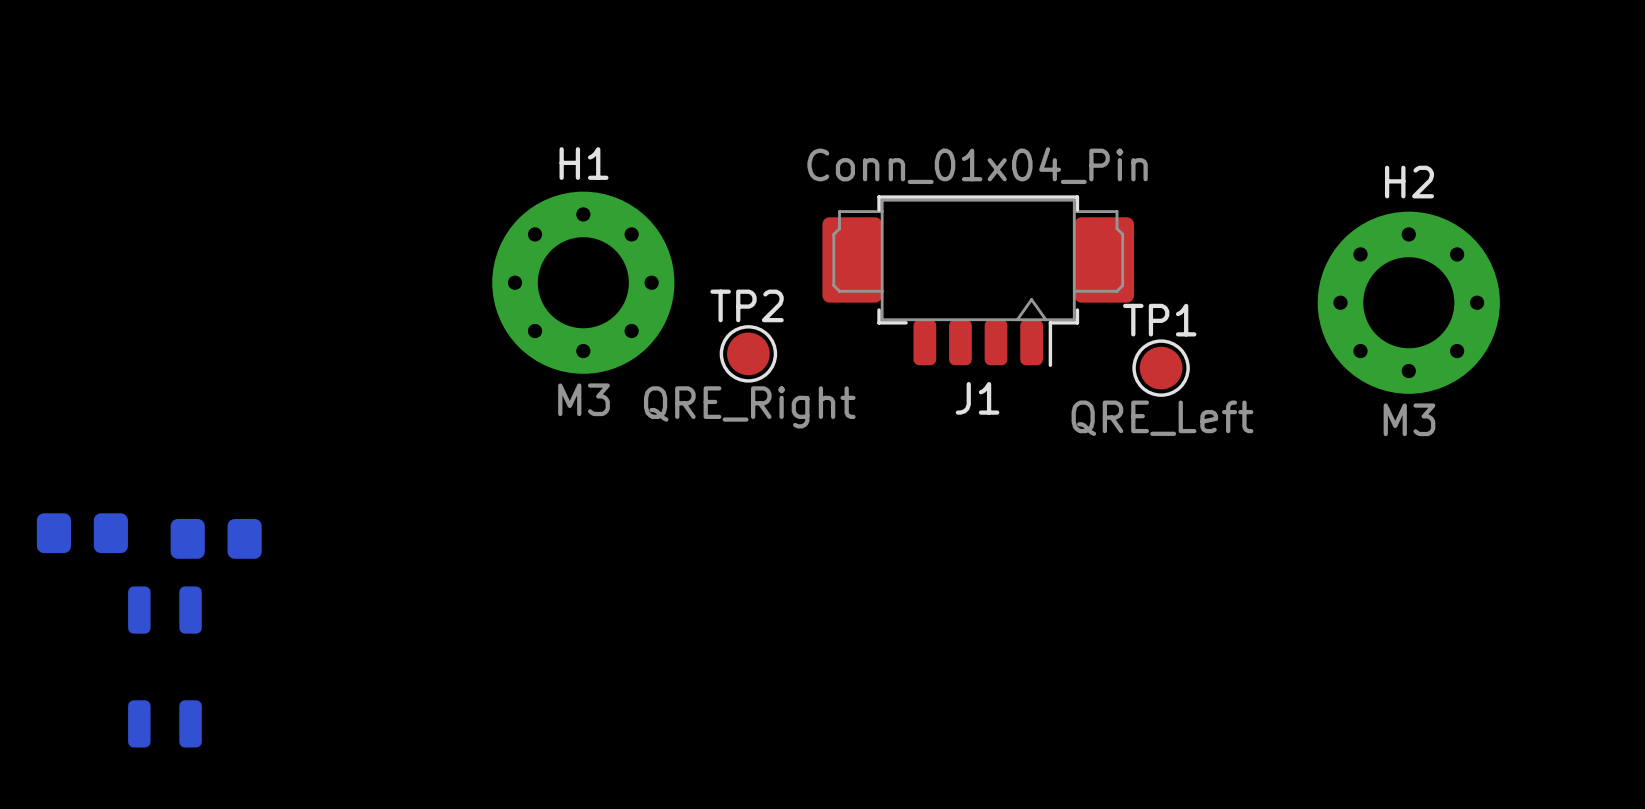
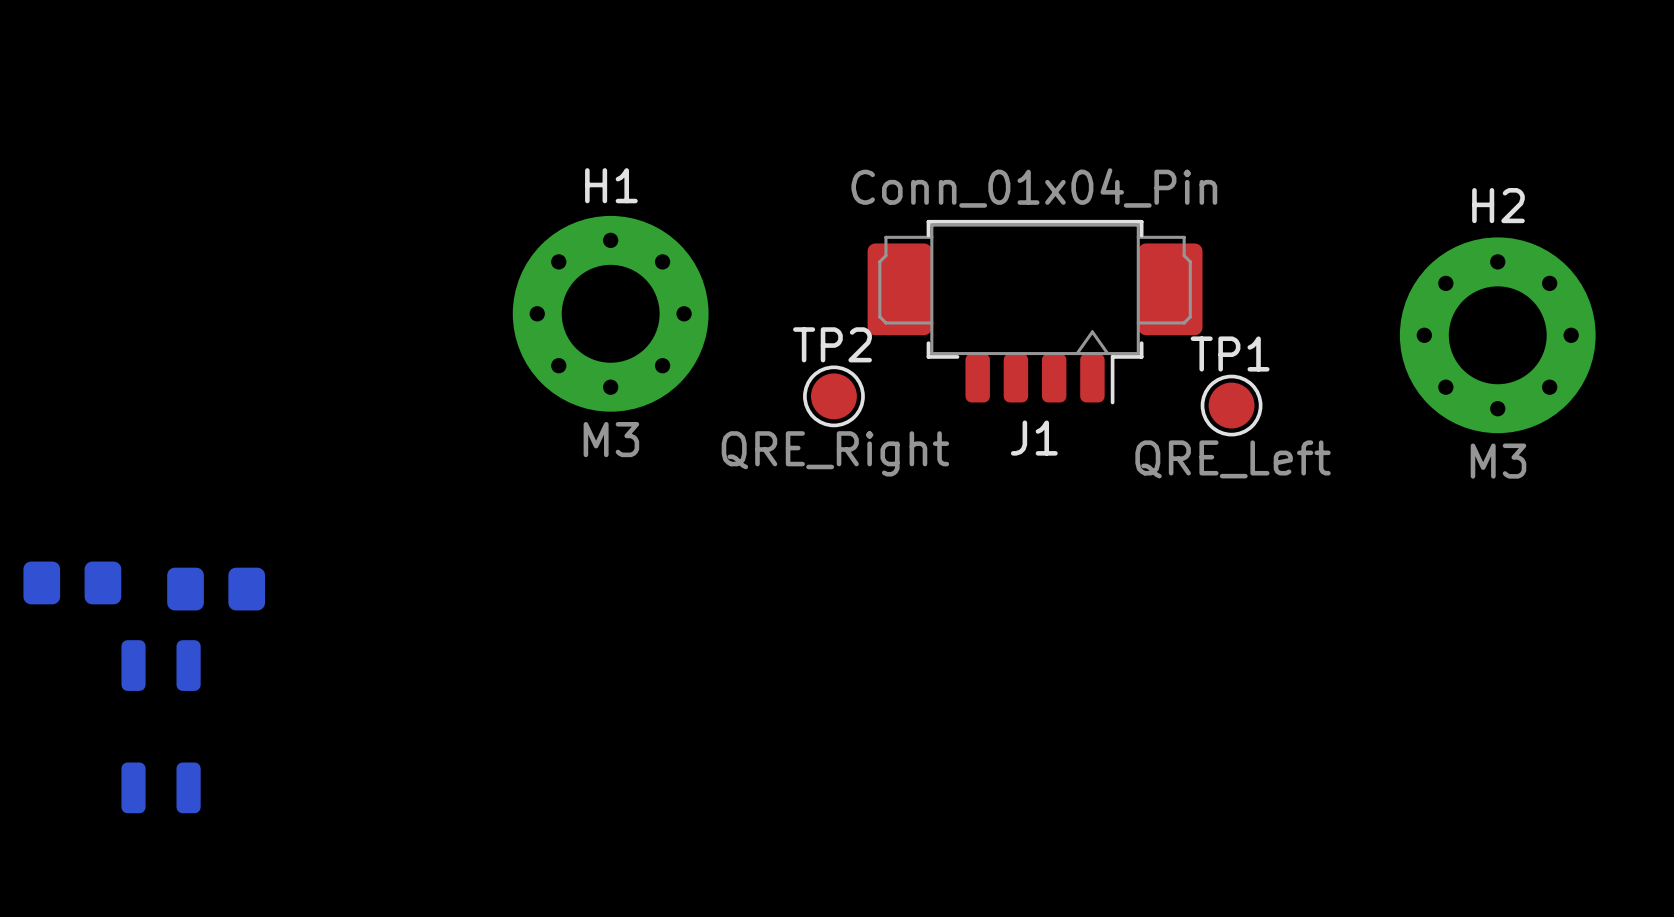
TP2 position: (748, 353) -> (833, 396)

